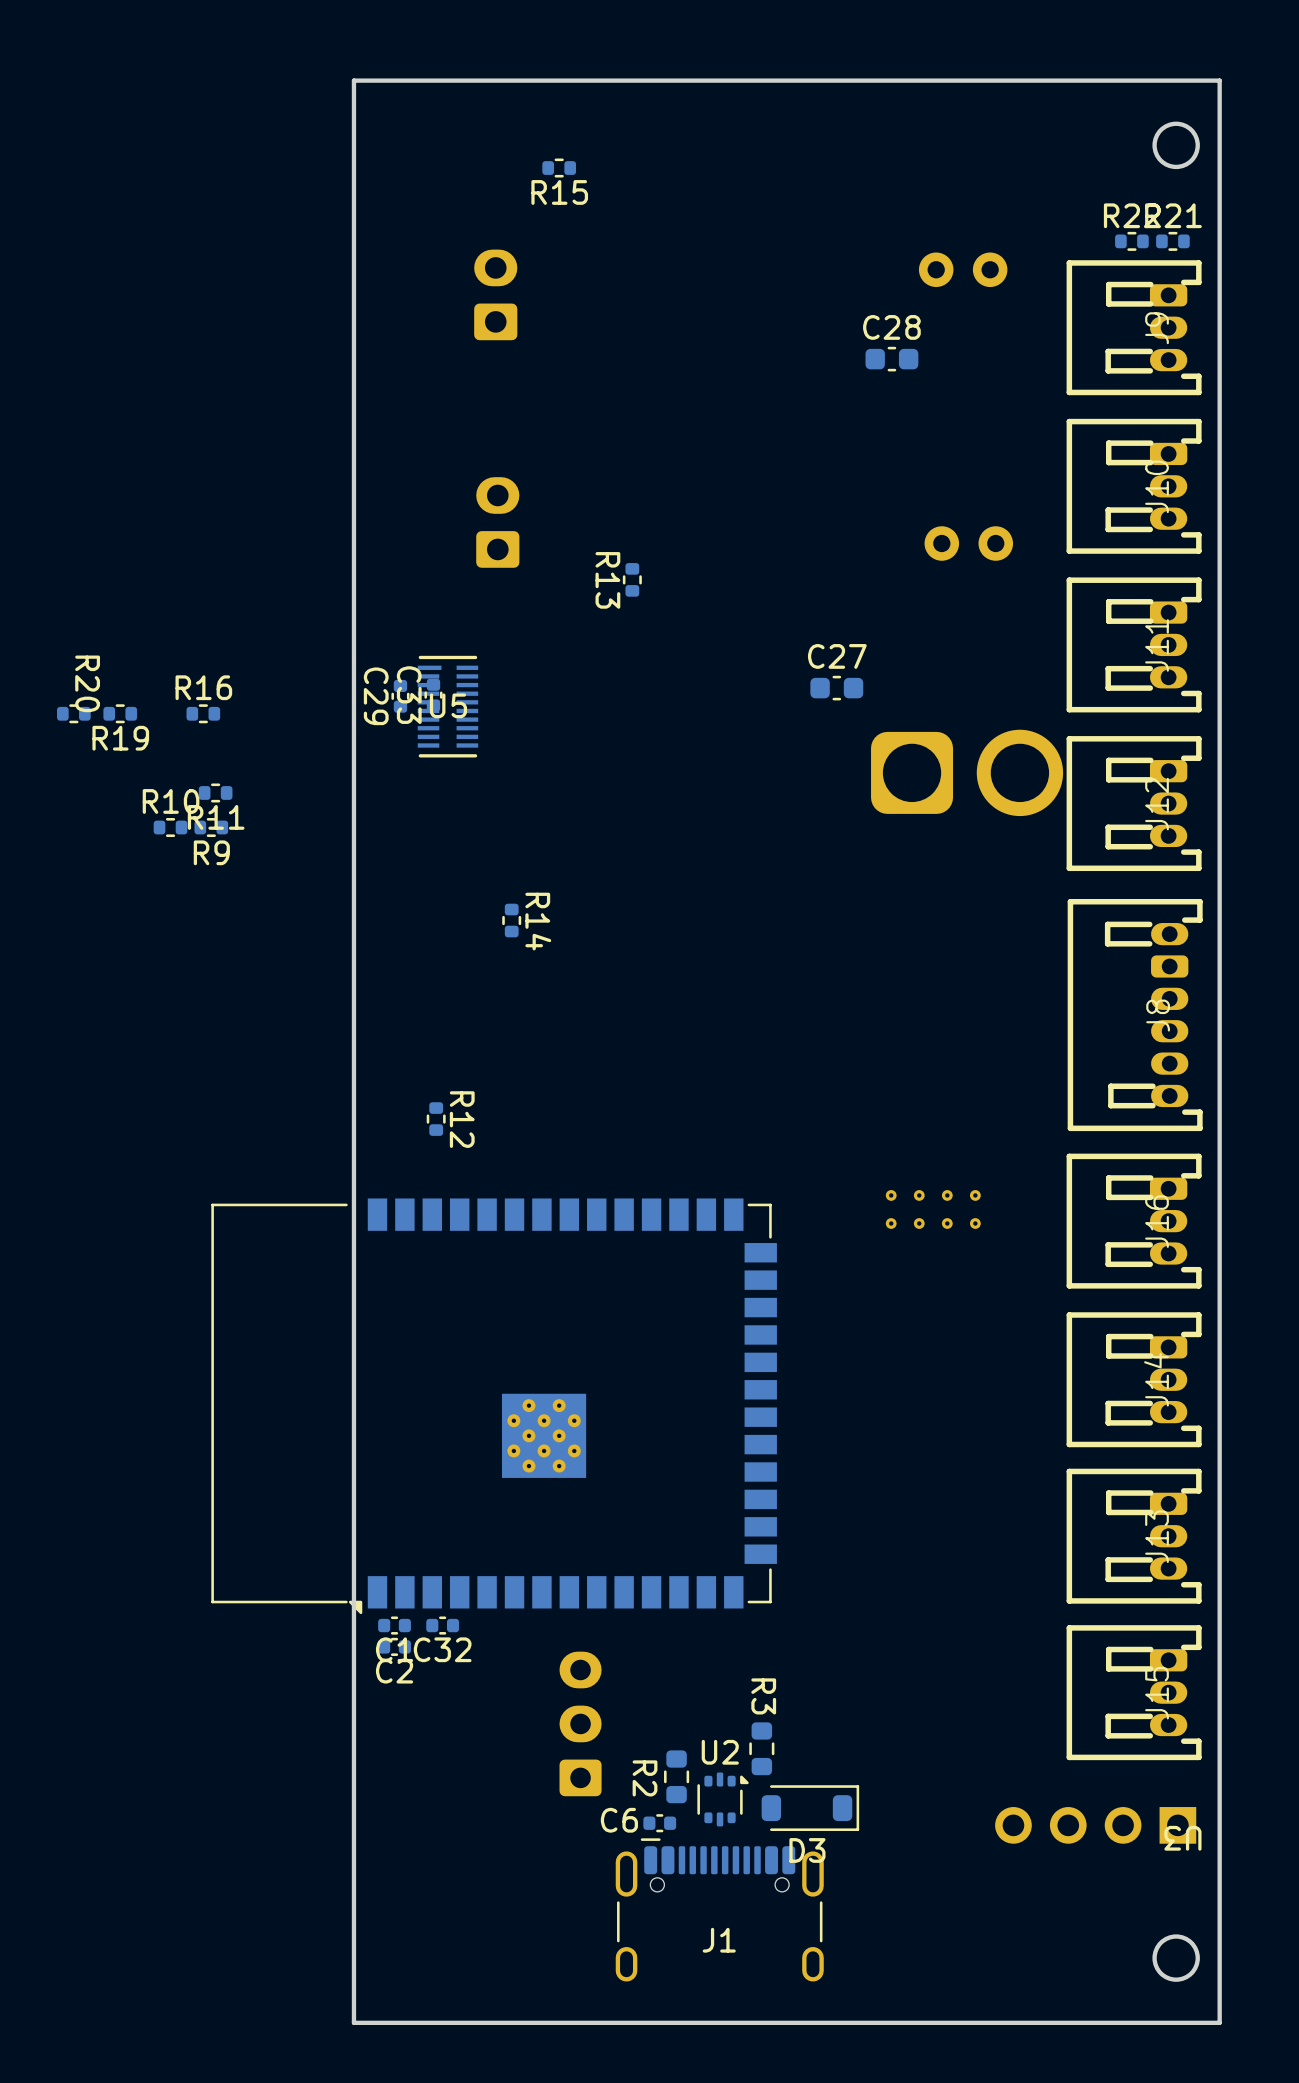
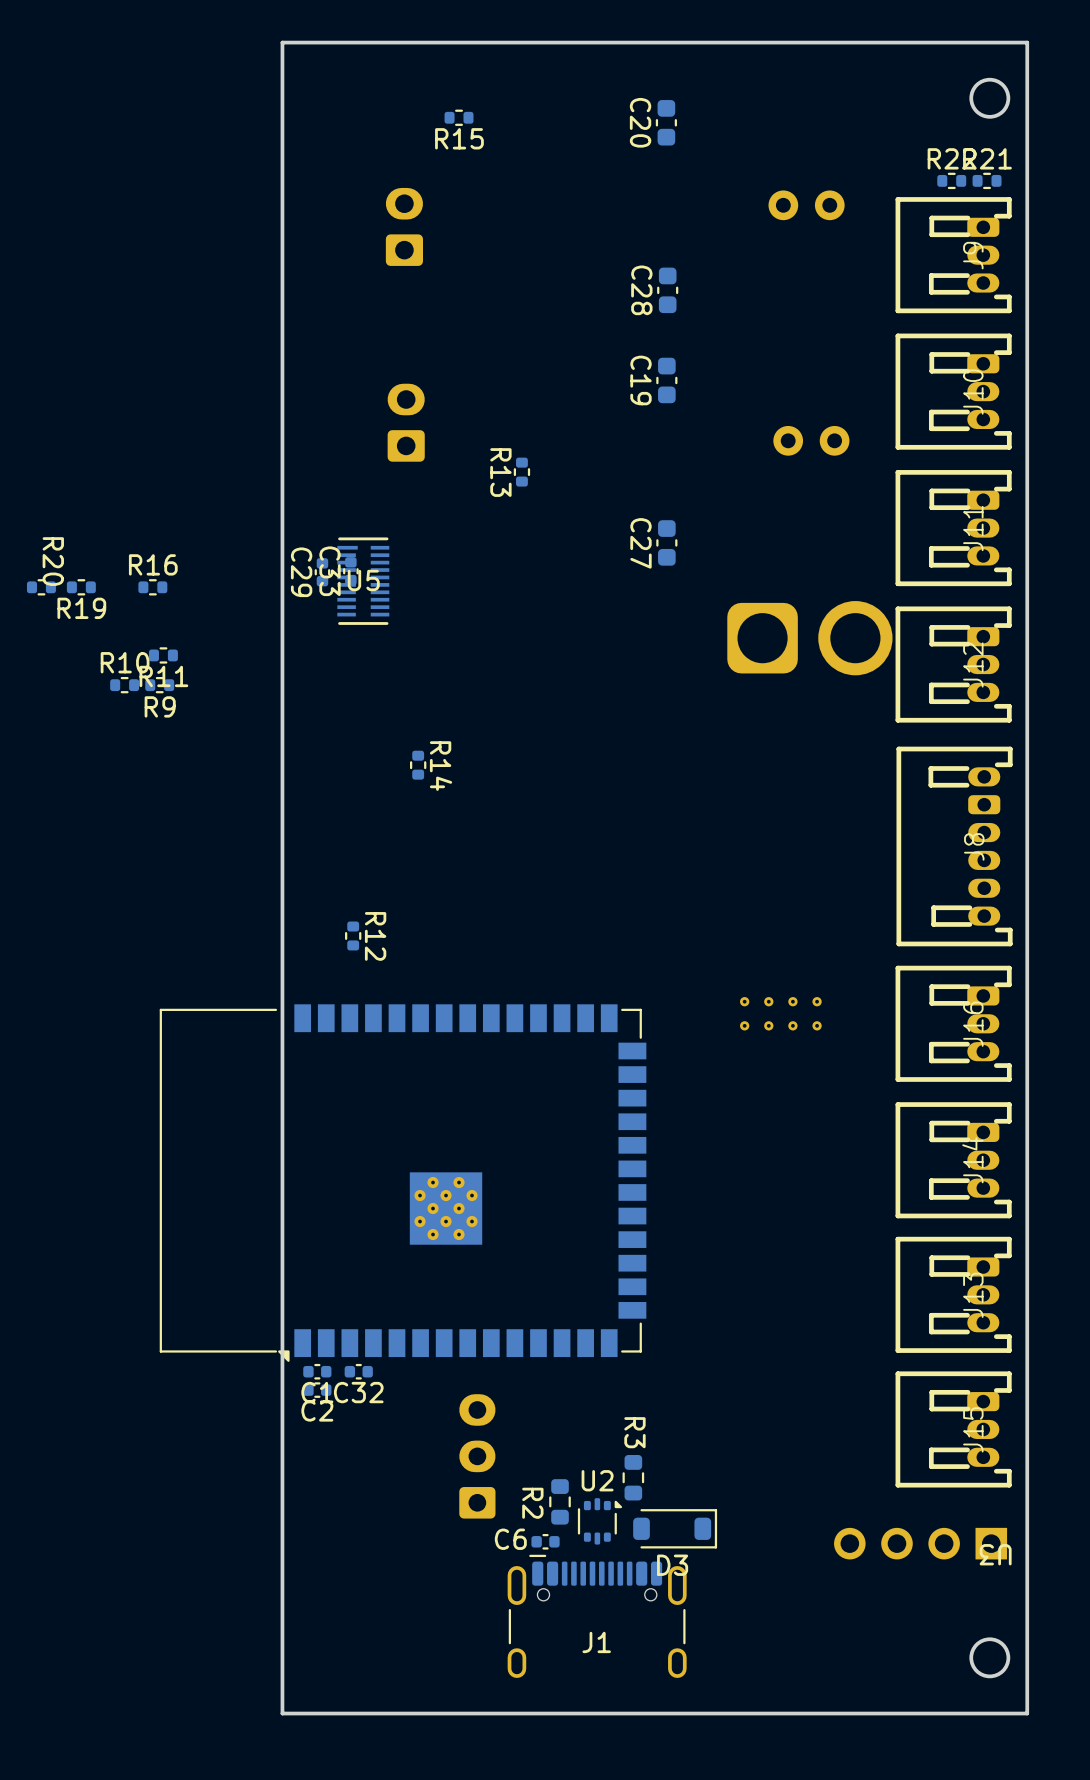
C20: none -> (666, 122)
C28 name position: C28 (891, 327) -> C28 (641, 290)
C28 rotation: 0° (891, 359) -> 90° clockwise (667, 290)
C28 position: (891, 359) -> (667, 290)
C19: none -> (666, 380)
C27 name position: C27 (837, 656) -> C27 (641, 543)
C27 rotation: 0° (836, 688) -> 90° clockwise (666, 542)
C27 position: (836, 688) -> (666, 542)

